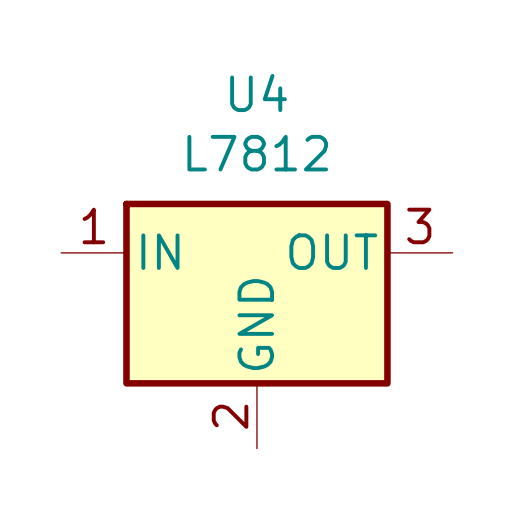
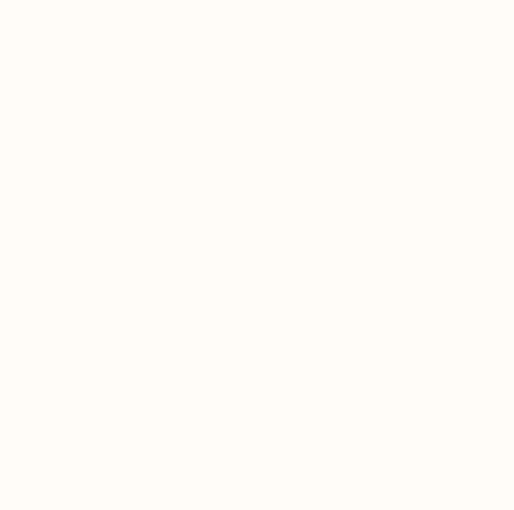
U4: L7812 (256, 324) -> none

